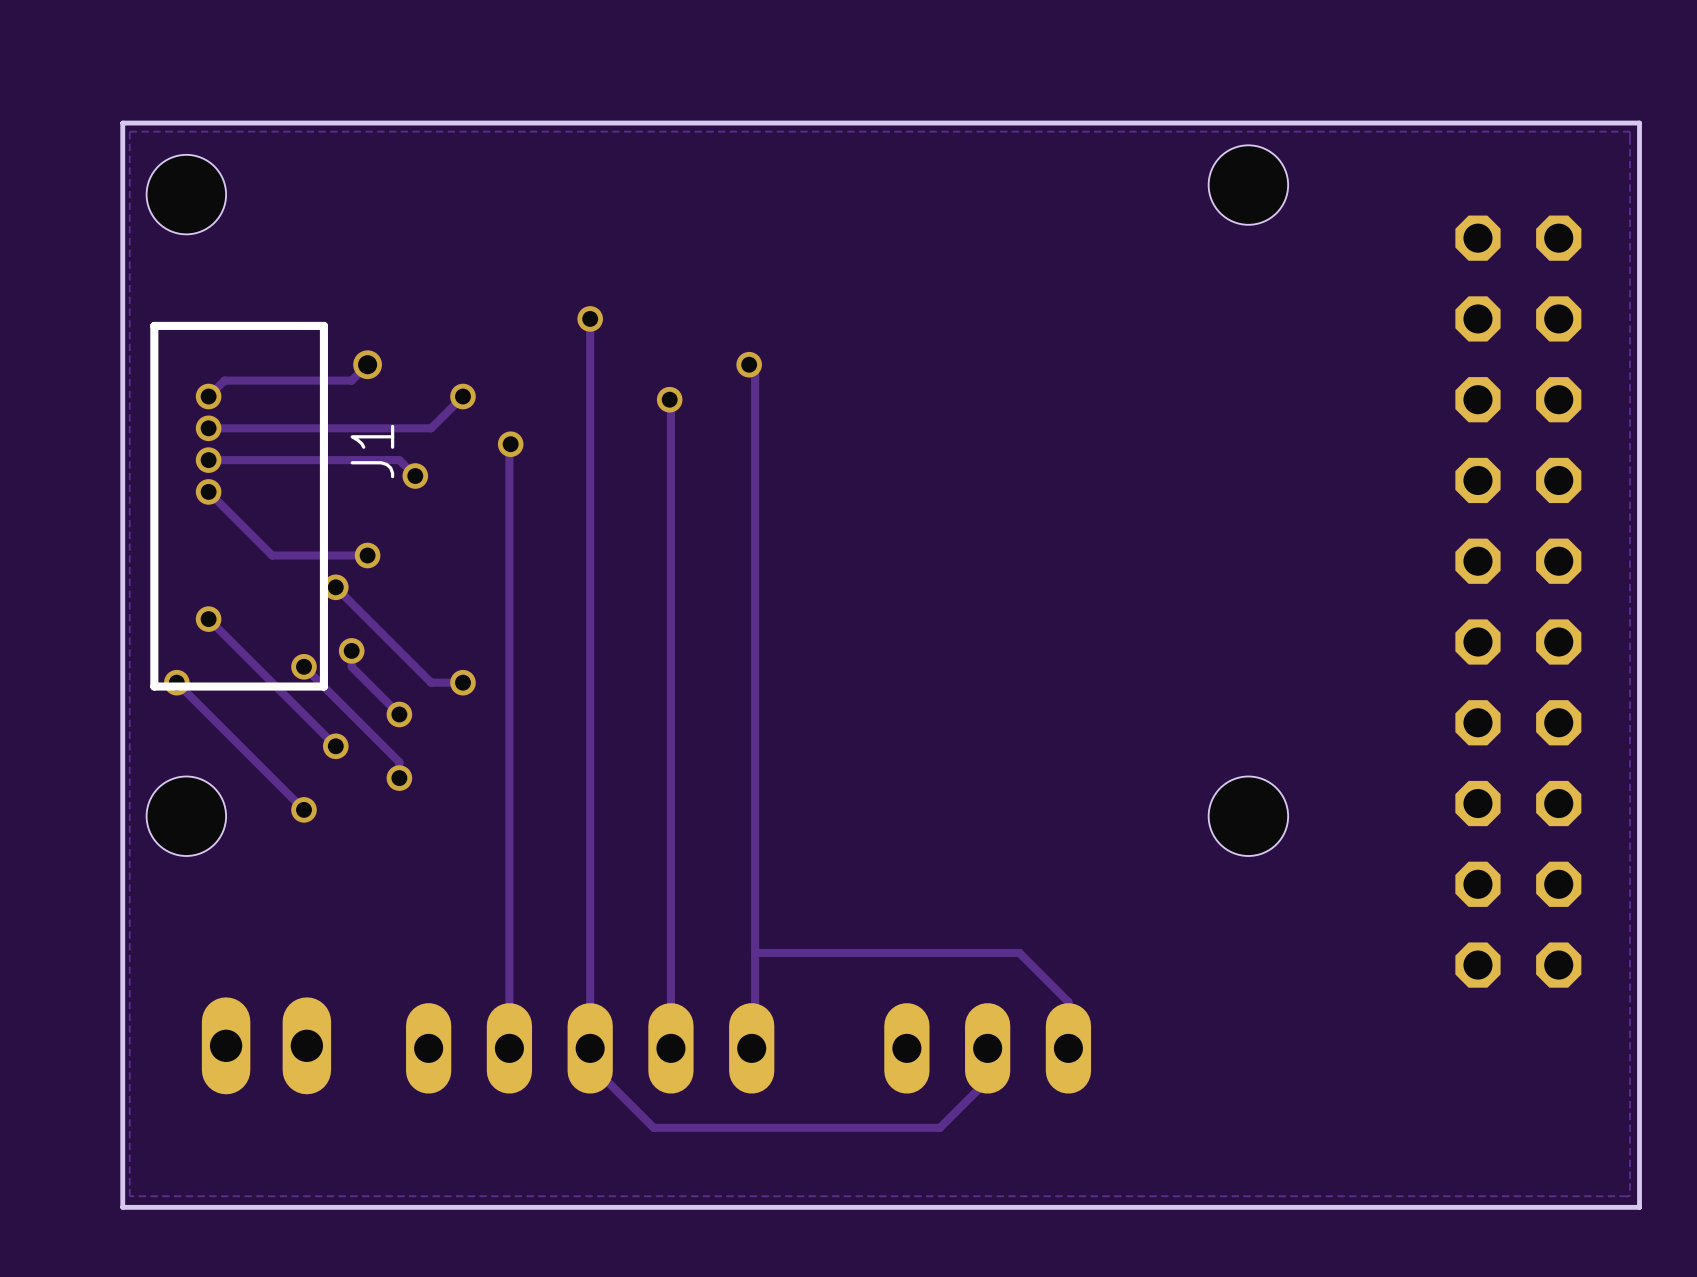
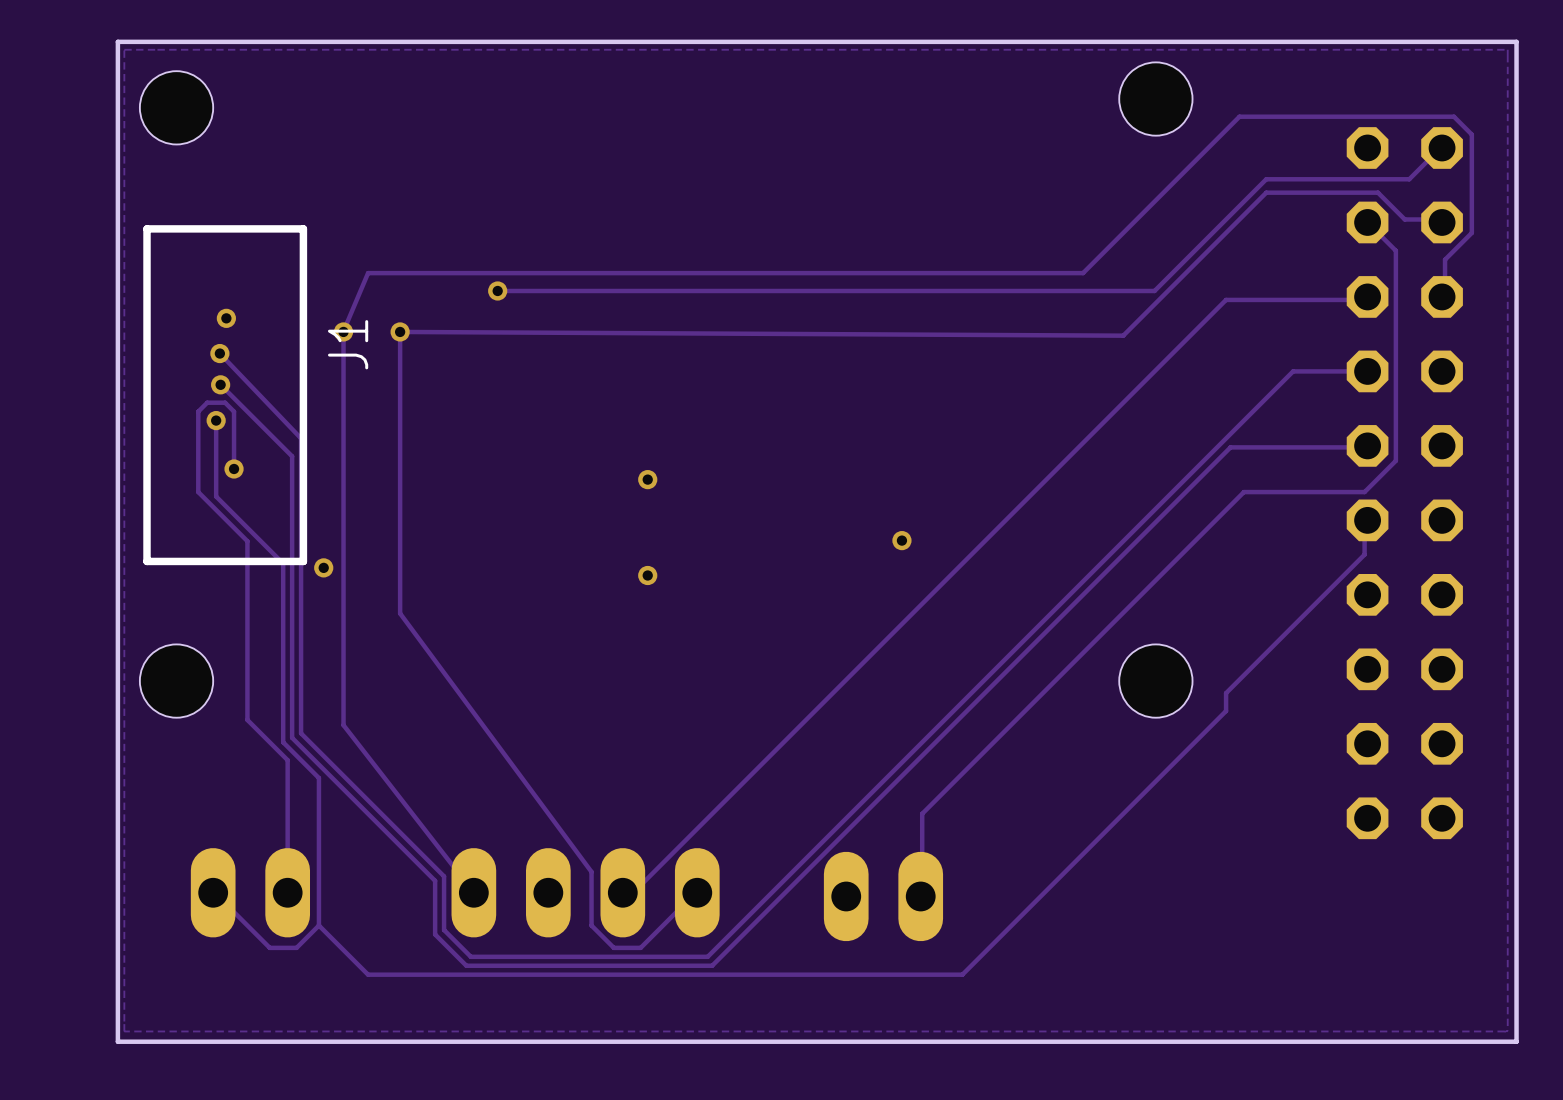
track: none -> (1442, 147) (1409, 179) (1266, 179) (1154, 290) (497, 290)
via: (590, 318) -> none
track: none -> (1367, 222) (1395, 250) (1395, 460) (1364, 492) (1243, 492) (922, 813) (920, 896)
track: none -> (1442, 222) (1440, 219) (1404, 219) (1378, 192) (1266, 192) (1123, 335) (400, 331) (400, 613) (591, 871) (591, 925) (613, 947) (640, 947) (697, 892)
track: (589, 319) (590, 1046) -> none
track: (367, 364) (351, 380) (224, 380) (208, 396) -> none
via: (367, 364) -> none
track: (749, 364) (755, 370) (755, 1049) -> none
via: (749, 364) -> none
via: none -> (497, 290)
via: (208, 396) -> none
track: (462, 396) (431, 428) (208, 428) -> none
via: (462, 396) -> none
track: (669, 399) (670, 1048) -> none
via: (669, 399) -> none
track: none -> (1367, 296) (1364, 299) (1226, 299) (636, 889) (622, 889) (622, 892)
track: none -> (1442, 296) (1445, 295) (1445, 259) (1471, 232) (1471, 134) (1453, 116) (1239, 116) (1083, 273) (368, 273) (343, 331) (343, 725) (473, 892)
via: none -> (226, 318)
via: (208, 428) -> none
via: none -> (343, 331)
via: none -> (400, 331)
via: (510, 444) -> none
track: (509, 445) (509, 1048) -> none
track: (208, 460) (399, 460) (415, 476) -> none
via: (208, 460) -> none
track: none -> (219, 353) (301, 438) (301, 733) (444, 876) (444, 930) (470, 956) (707, 956) (1293, 371) (1367, 371)
via: none -> (219, 353)
via: (415, 476) -> none
track: (208, 491) (272, 555) (367, 555) -> none
via: (208, 491) -> none
track: none -> (220, 384) (292, 456) (292, 737) (435, 880) (435, 934) (466, 965) (712, 965) (1230, 447) (1367, 445)
via: none -> (220, 384)
track: none -> (216, 420) (216, 496) (283, 563) (283, 742) (318, 778) (318, 925)
via: none -> (216, 420)
via: (367, 555) -> none
track: none -> (234, 468) (234, 411) (225, 402) (207, 402) (198, 411) (198, 492) (247, 541) (247, 719) (287, 760) (287, 892)
via: none -> (234, 468)
track: (335, 587) (431, 682) (462, 682) -> none
via: (335, 587) -> none
via: none -> (647, 479)
track: (208, 619) (335, 746) -> none
via: (208, 619) -> none
track: none -> (1367, 520) (1364, 523) (1364, 554) (1226, 693) (1226, 711) (962, 974) (368, 974) (318, 925)
track: (351, 650) (351, 666) (399, 714) -> none
via: (351, 650) -> none
via: none -> (901, 540)
track: (304, 666) (399, 762) (399, 778) -> none
via: (304, 666) -> none
track: (176, 682) (304, 809) -> none
via: (176, 682) -> none
via: (462, 682) -> none
via: none -> (323, 567)
via: none -> (647, 575)
via: (399, 714) -> none
via: (335, 746) -> none
via: (399, 778) -> none
via: (304, 809) -> none
track: (755, 952) (1019, 952) (1068, 1001) (1068, 1048) -> none
track: none -> (213, 892) (269, 947) (296, 947) (318, 925)
part: none -> (585, 892)
part: (590, 1048) -> none
track: (987, 1048) (987, 1080) (939, 1127) (653, 1127) (590, 1064) (590, 1048) -> none
part: (987, 1048) -> none
part: none -> (883, 896)

